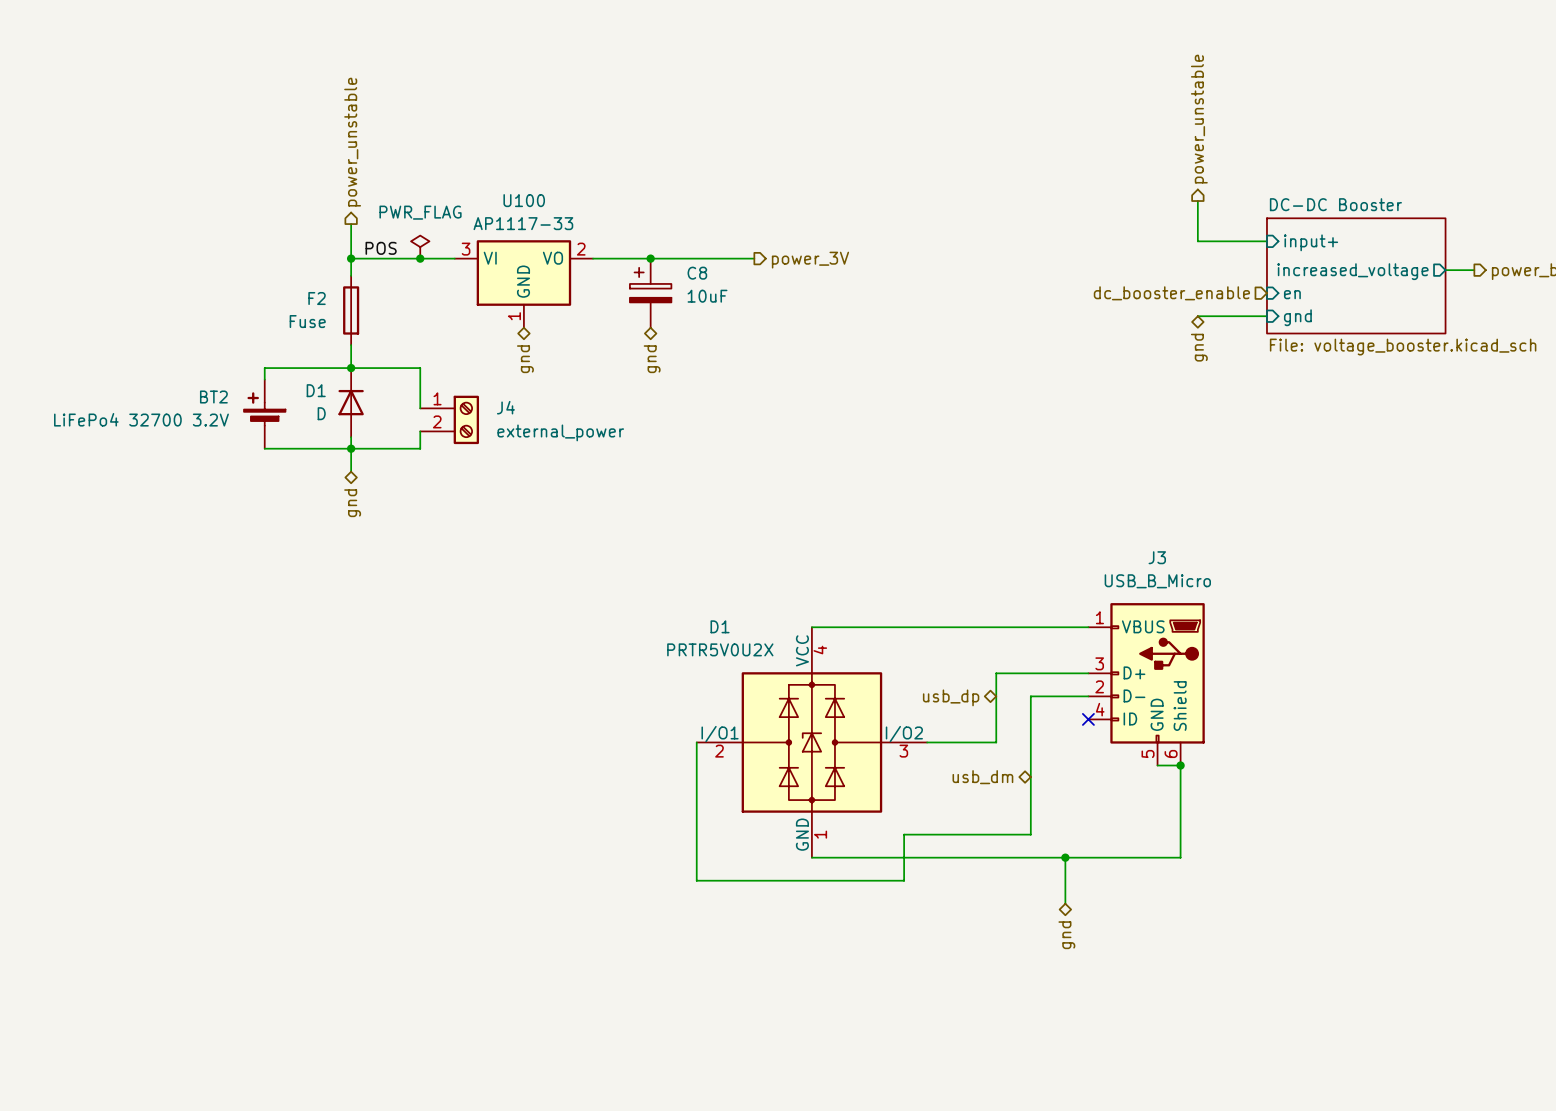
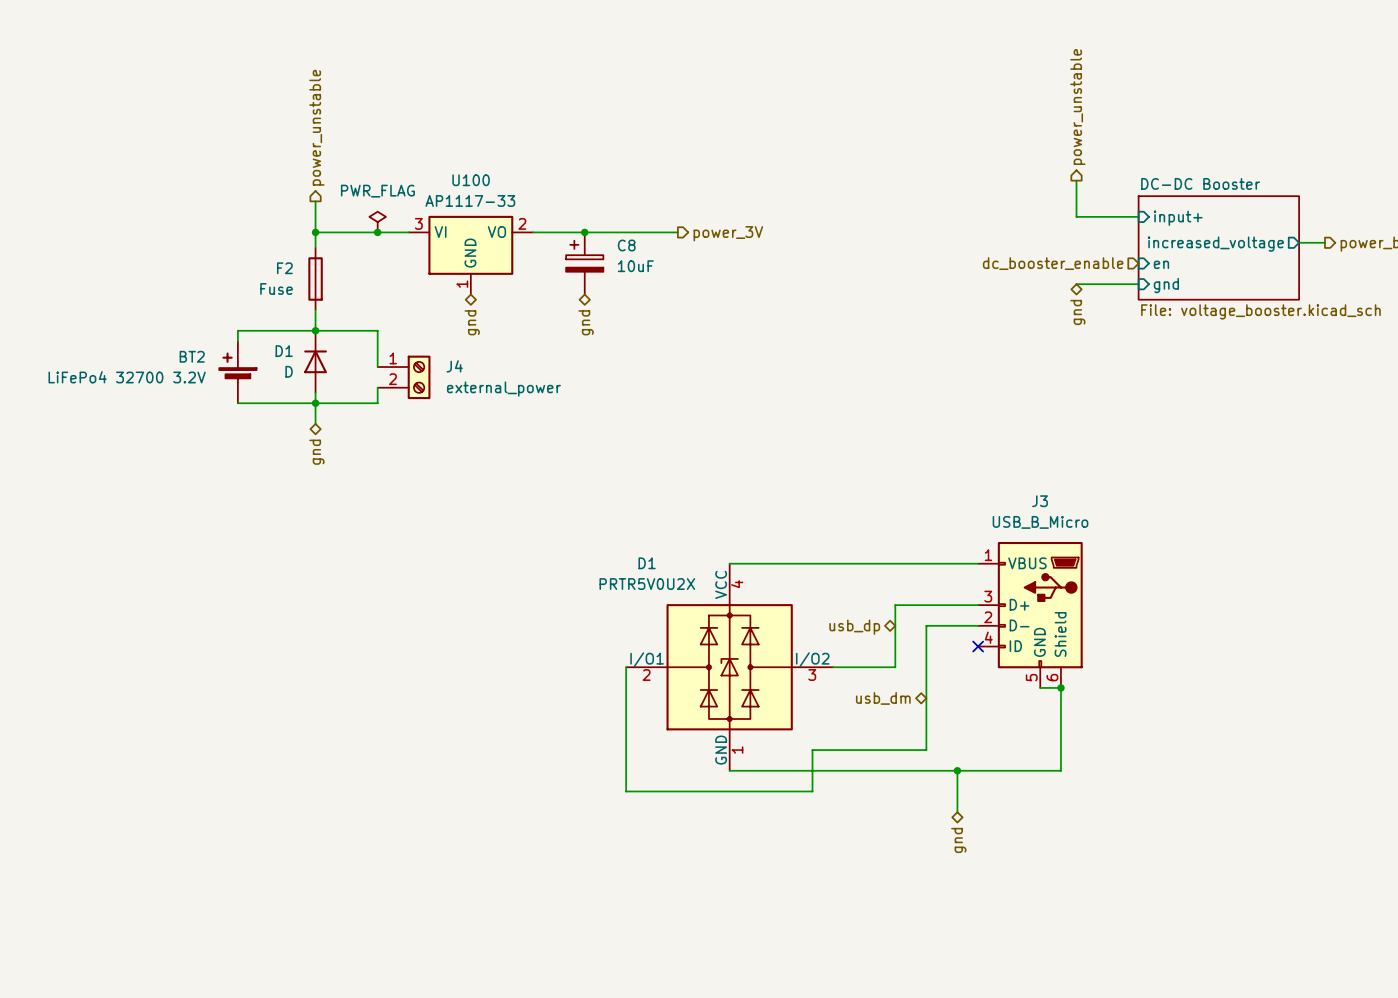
label: POS (381, 248) -> none

